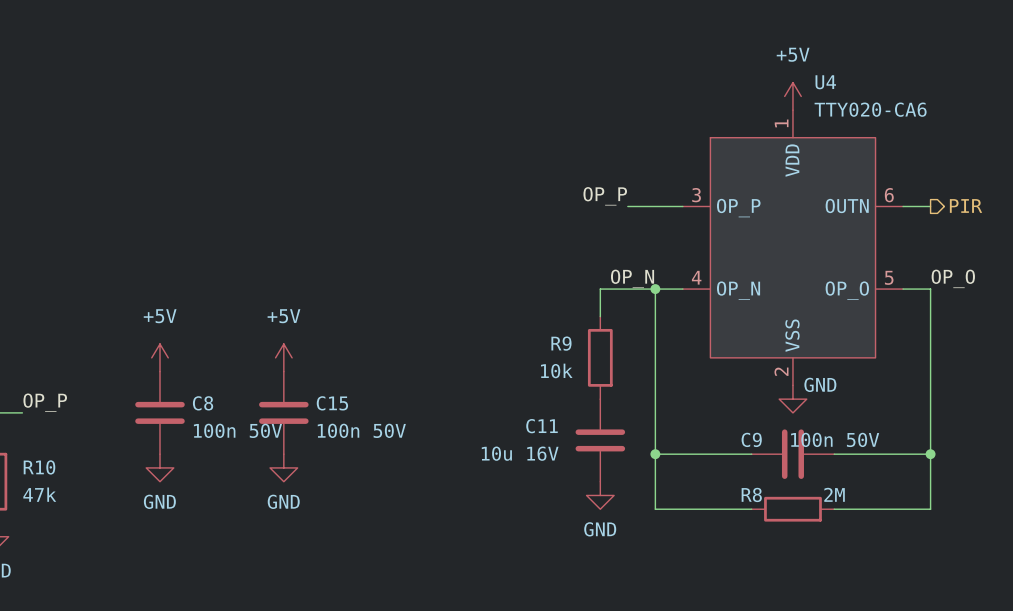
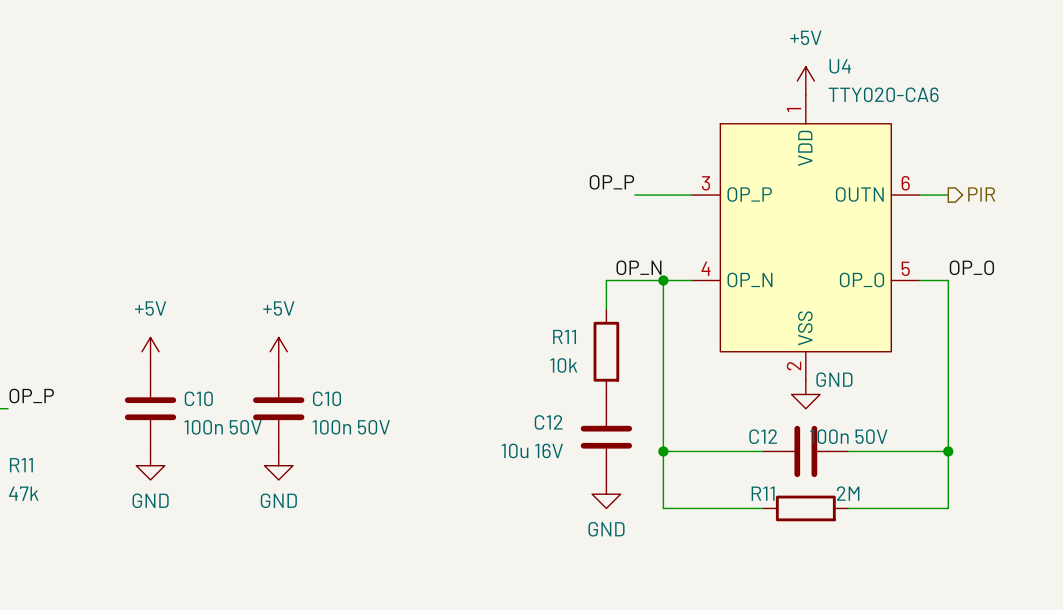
R9 name: R9 (561, 343) -> R11 (564, 336)
C8 name: C8 (203, 403) -> C10 (198, 398)
C15 name: C15 (332, 403) -> C10 (326, 398)
C11 name: C11 (542, 426) -> C12 (548, 422)
C9 name: C9 (751, 439) -> C12 (763, 436)
R10 name: R10 (39, 467) -> R11 (21, 465)
R8 name: R8 (751, 494) -> R11 (763, 493)

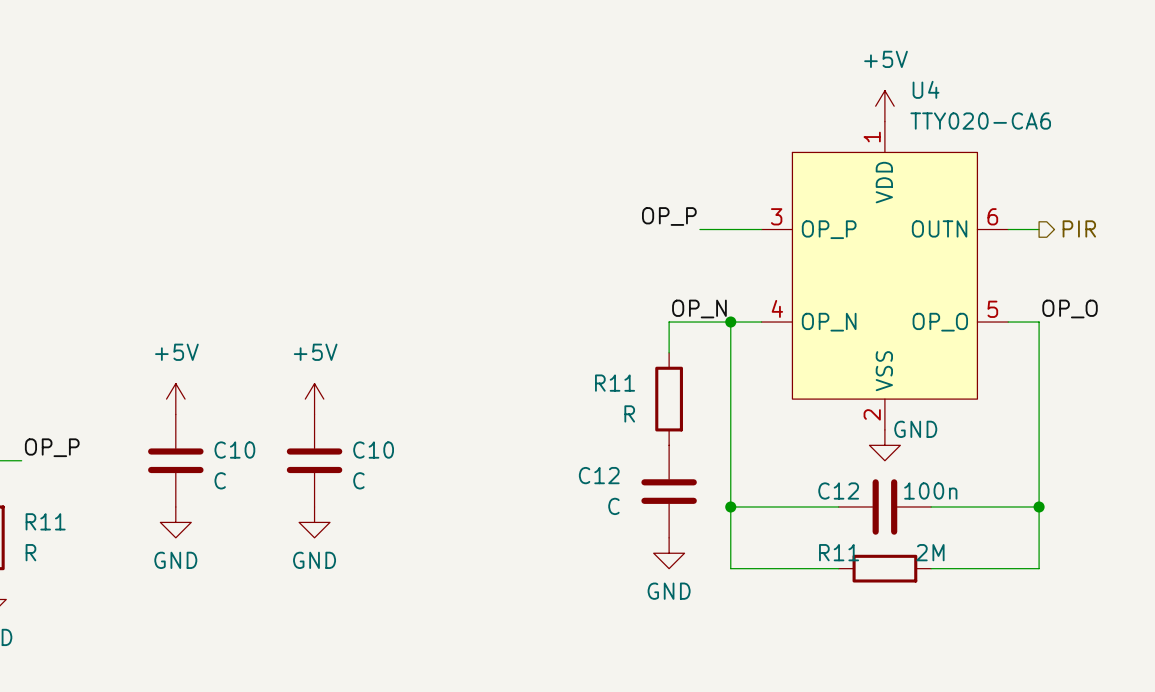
R11 value: 10k (563, 365) -> R (629, 413)
C10 value: 100n 50V (223, 427) -> C (220, 480)
C10 value: 100n 50V (351, 427) -> C (358, 480)
C12 value: 100n 50V (848, 436) -> 100n (930, 491)
C12 value: 10u 16V (532, 450) -> C (613, 506)
R11 value: 47k (23, 493) -> R (30, 552)

